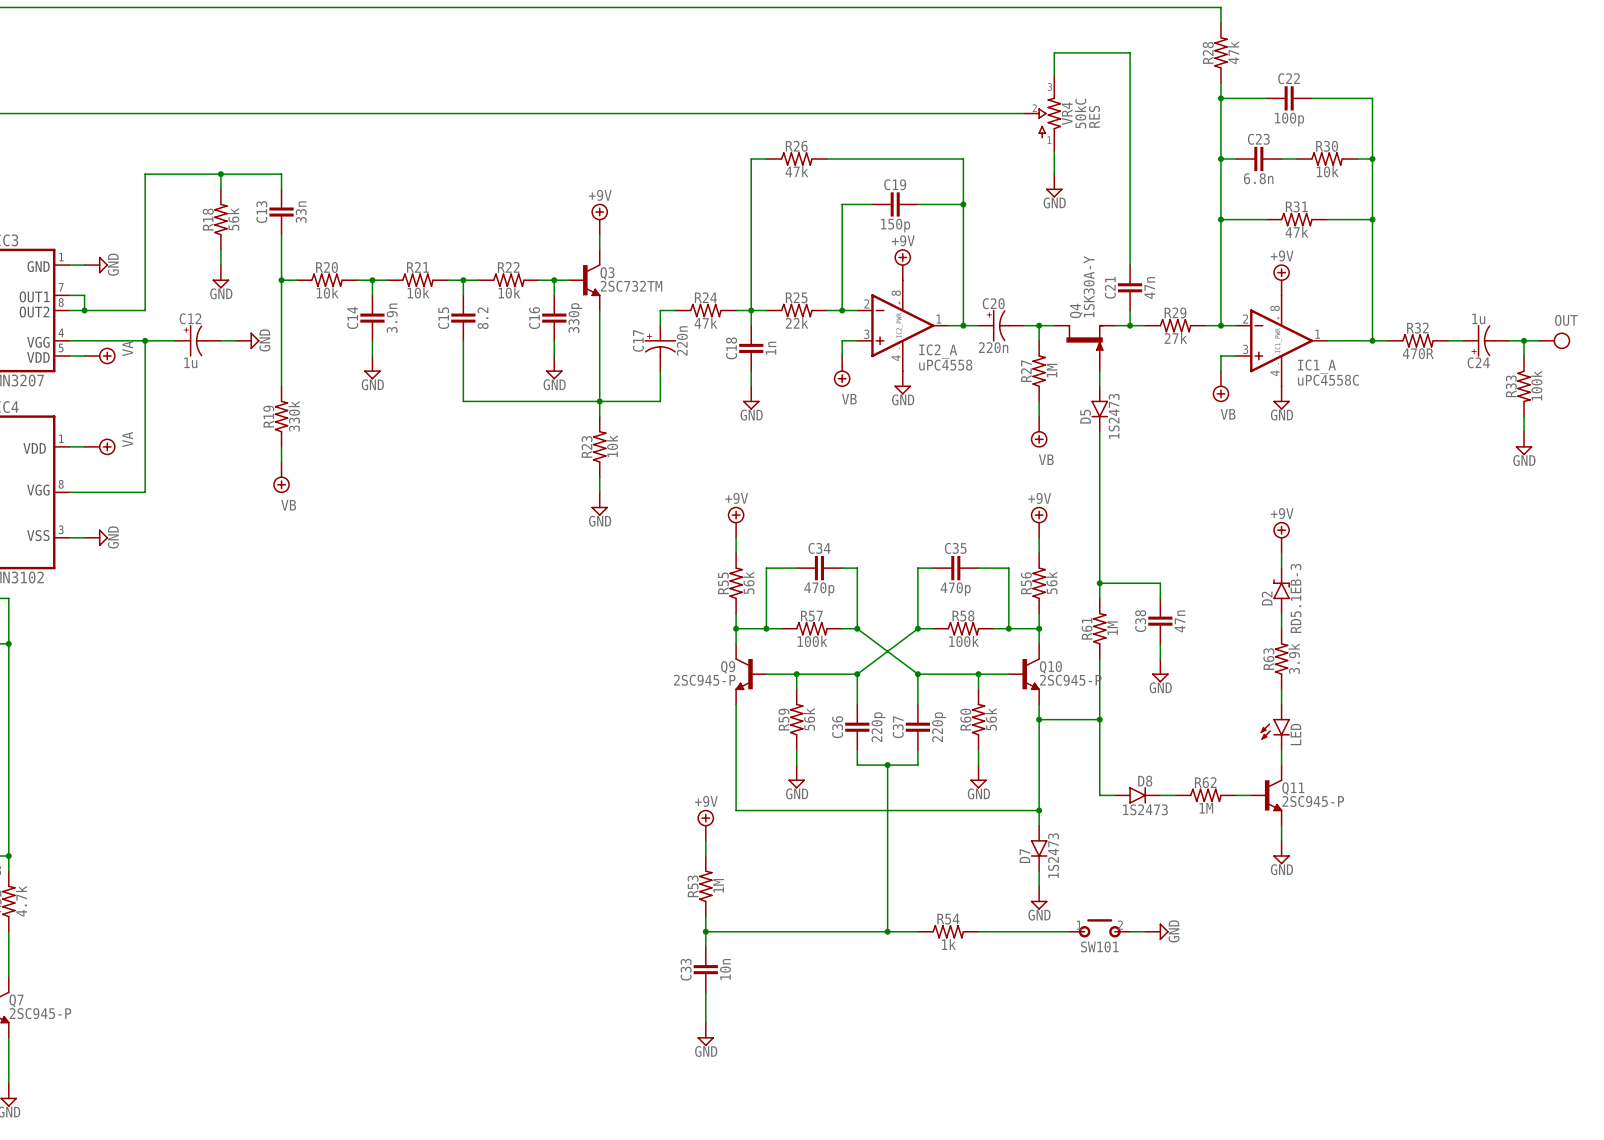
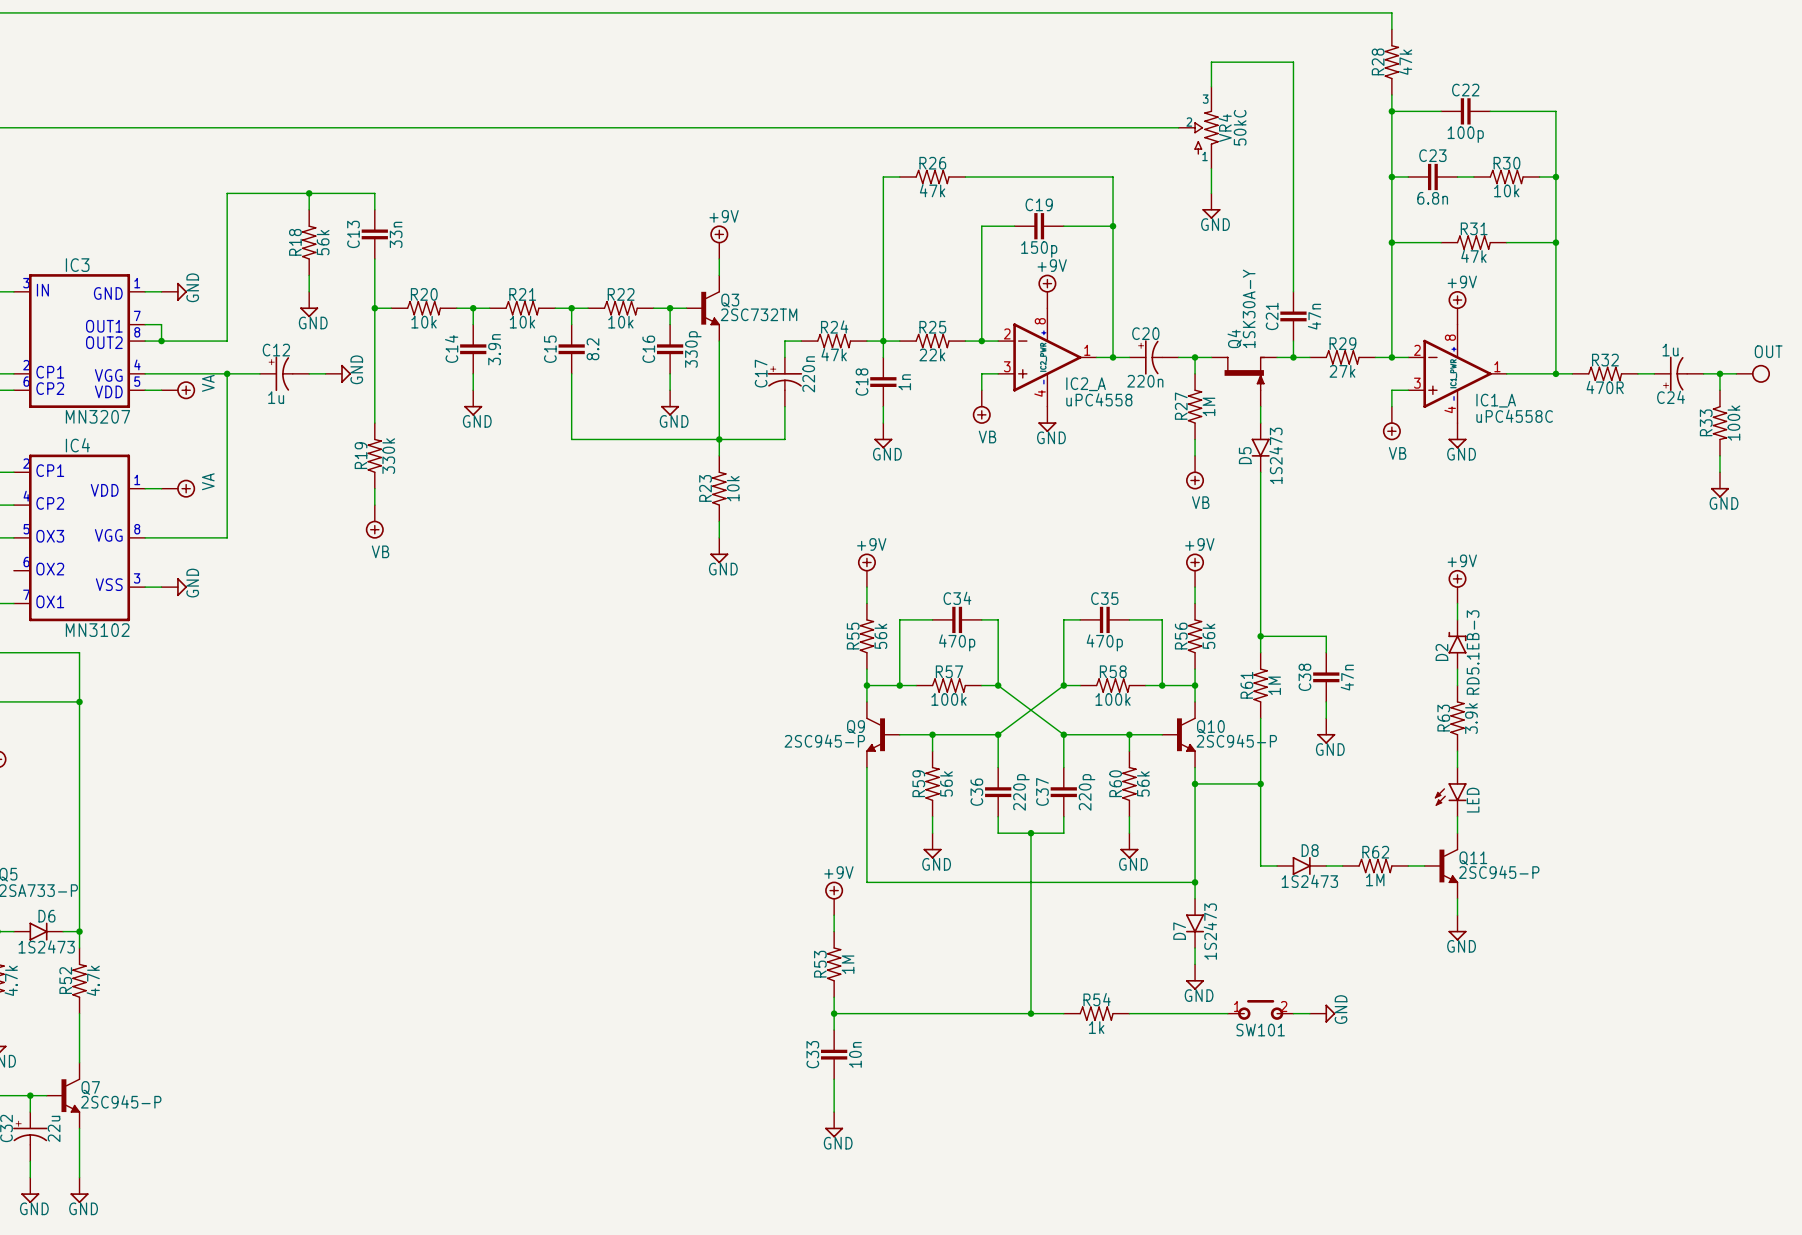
text: RES (1094, 116) -> none

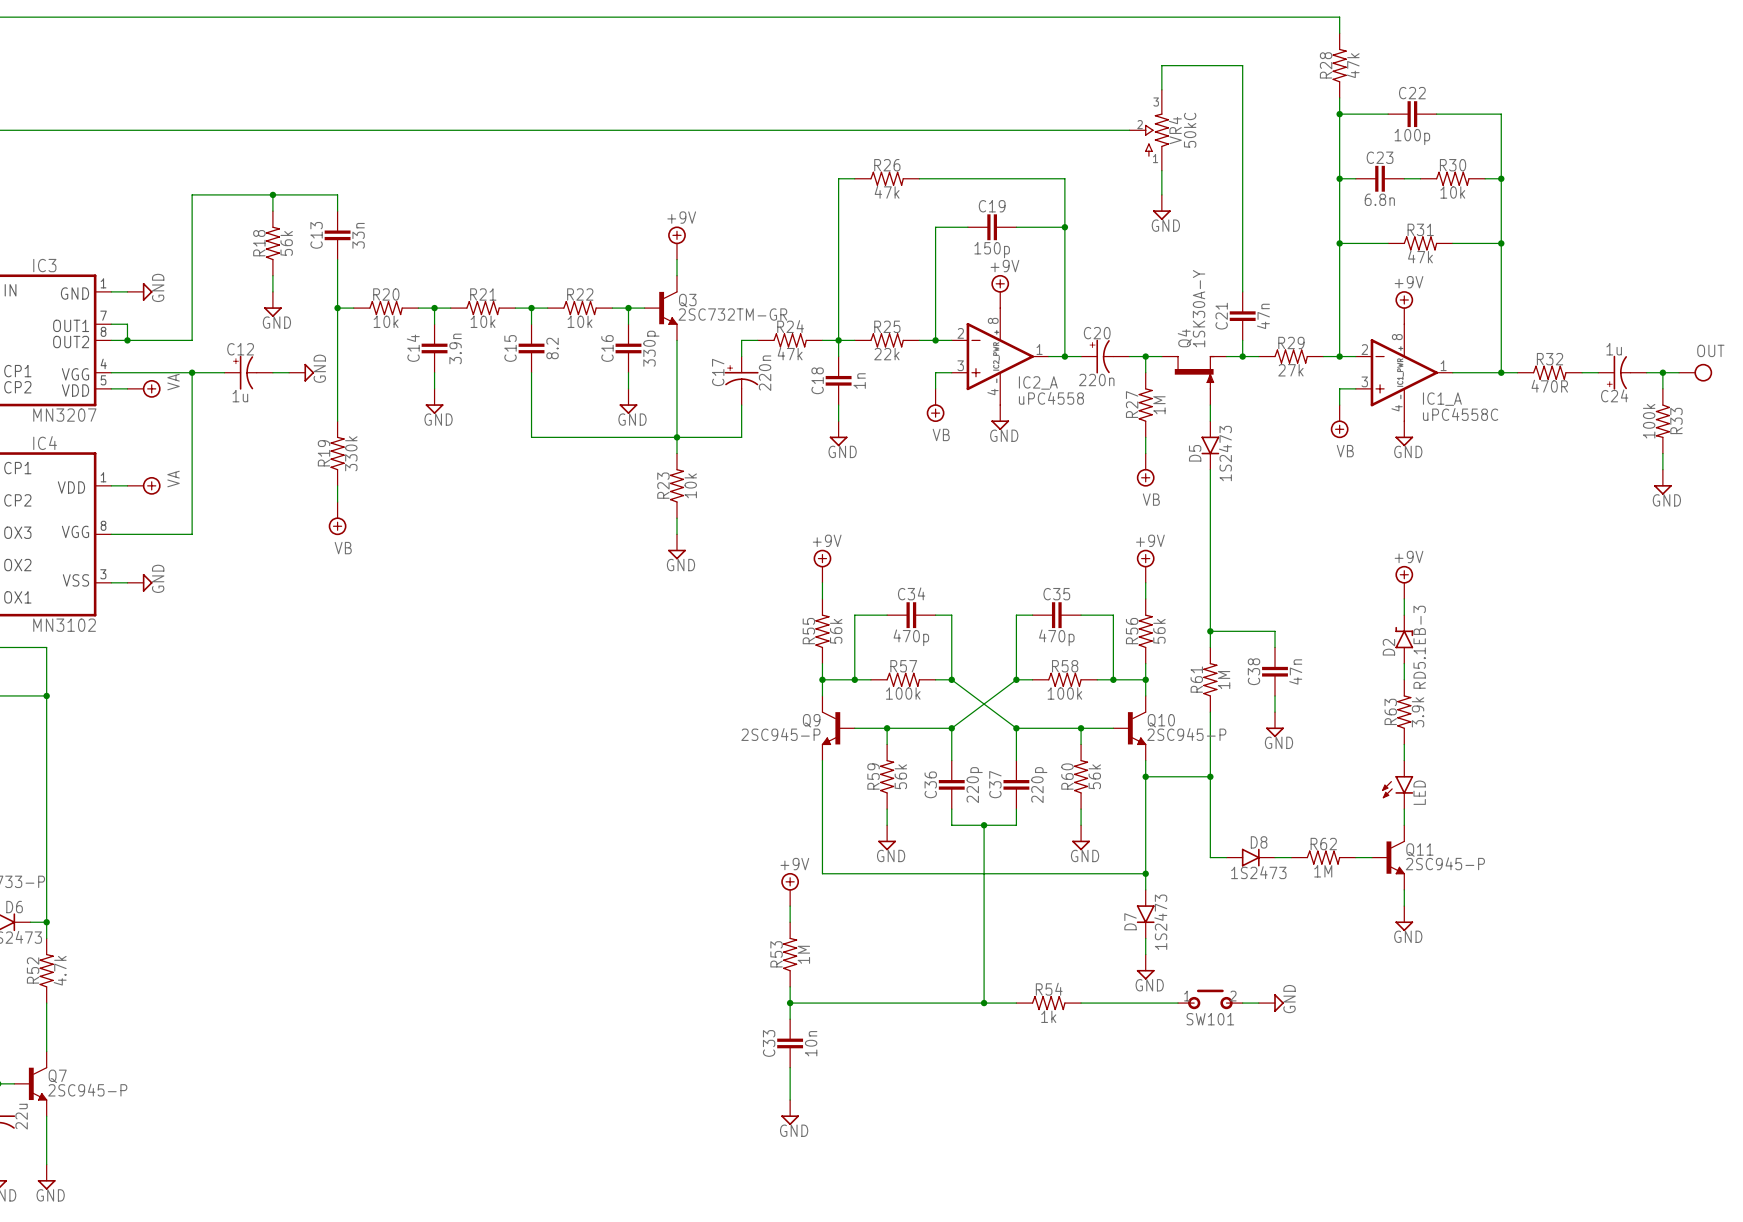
Q3 value: 2SC732TM (759, 314) -> 2SC732TM-GR (732, 314)
R33 flip: as is (1719, 423) -> left-right (1662, 421)

